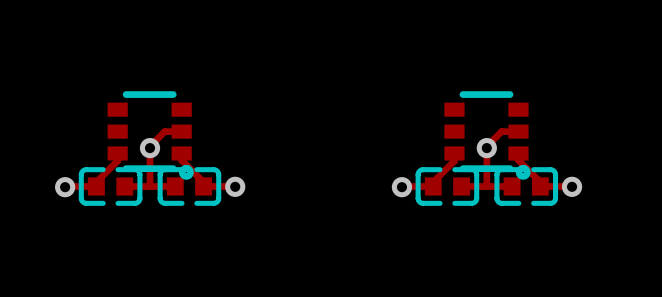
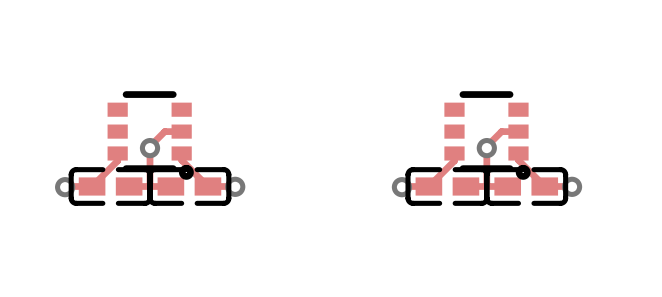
part footprint: [78, 167, 143, 206] -> [68, 167, 153, 206]
part footprint: [157, 167, 222, 206] -> [147, 167, 232, 206]
part footprint: [415, 167, 480, 206] -> [405, 167, 490, 206]
part footprint: [494, 167, 559, 206] -> [484, 167, 569, 206]

